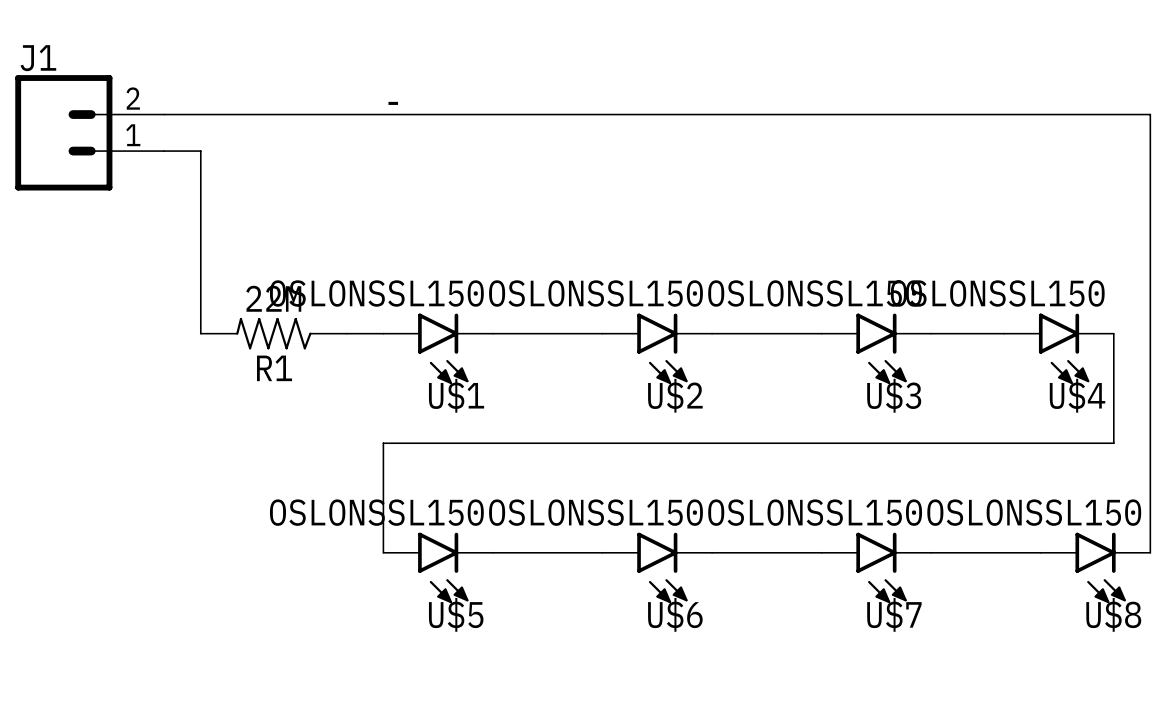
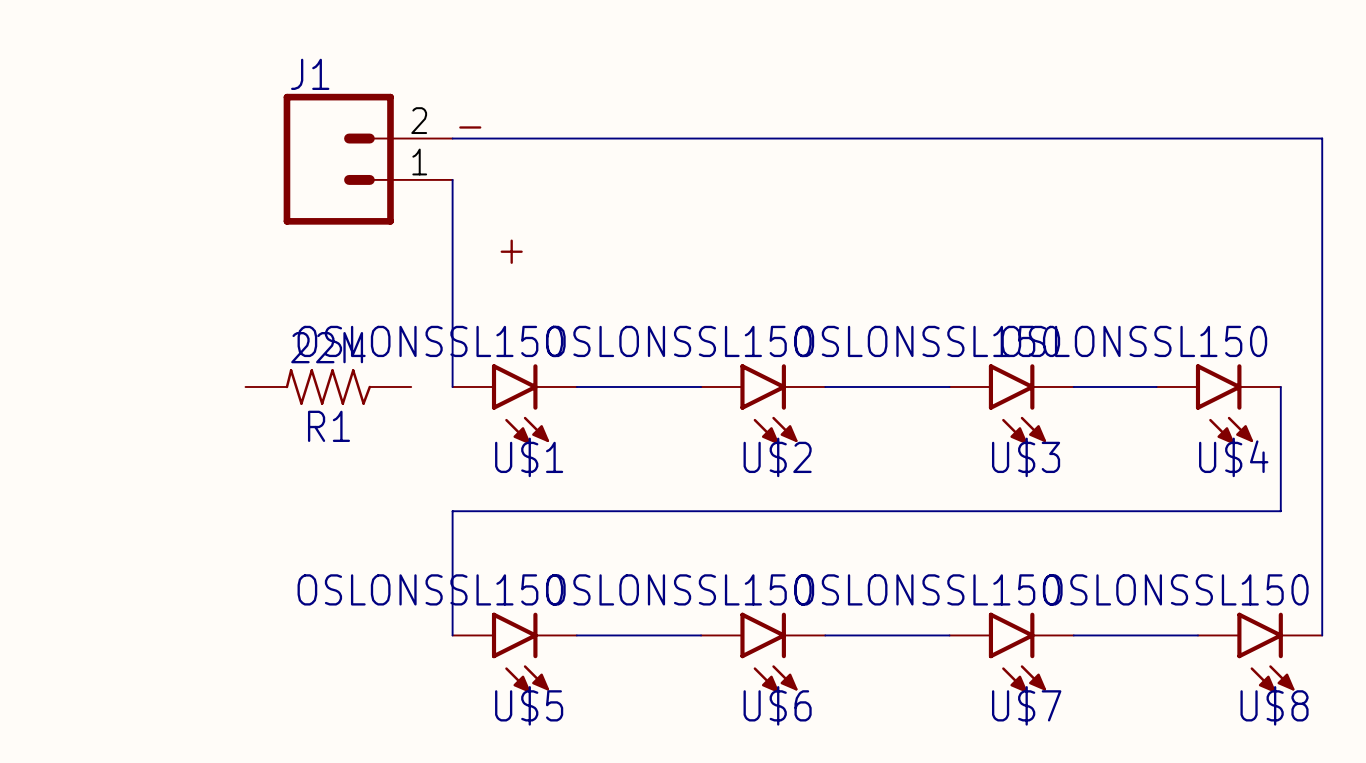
wire: (164, 114) (383, 114) -> none
J1 position: (89, 132) -> (368, 159)
wire: (164, 151) (200, 151) (200, 333) -> none
label: none -> + (511, 251)
wire: (346, 333) (383, 333) -> (452, 179) (452, 386)

